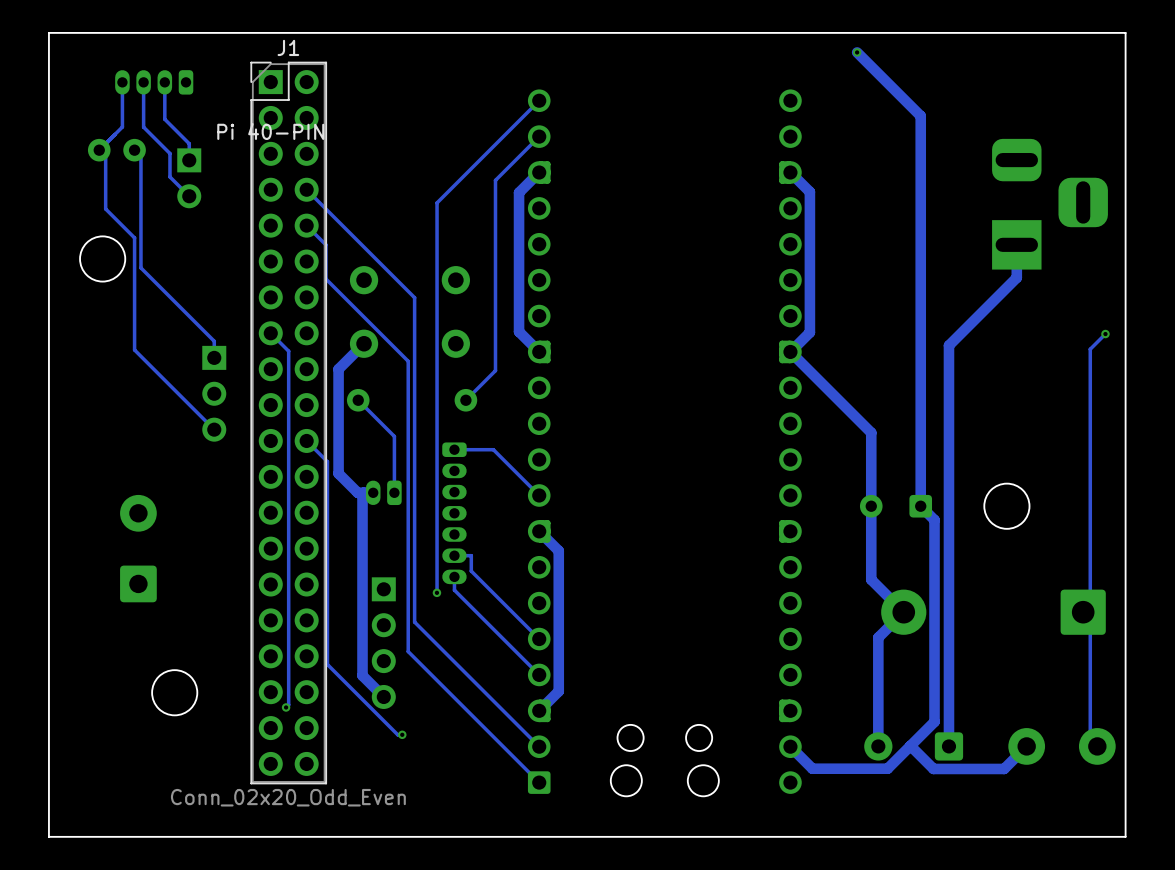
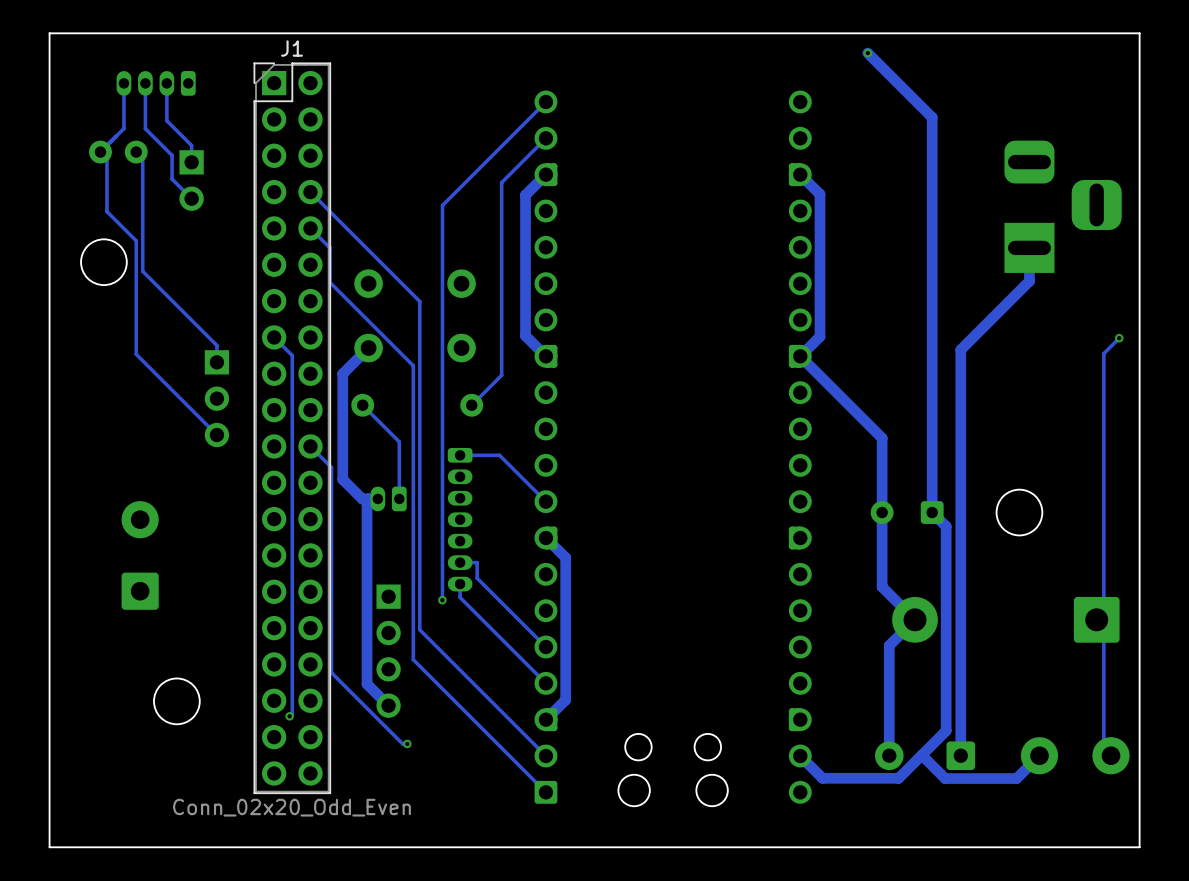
text: Pi 40-PIN (270, 131) -> none

